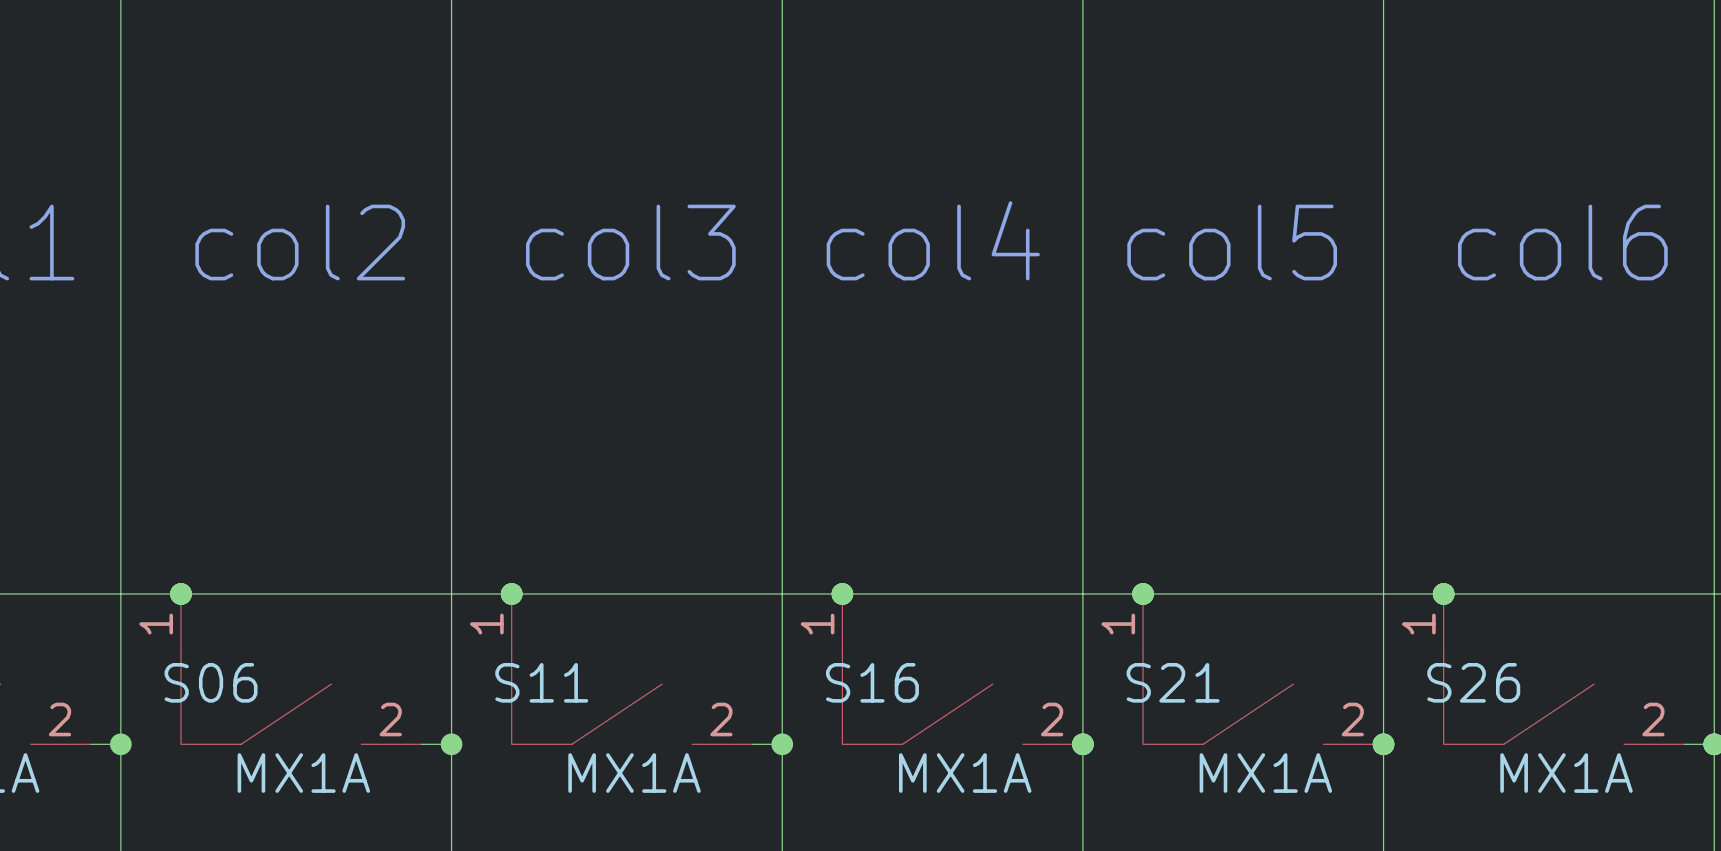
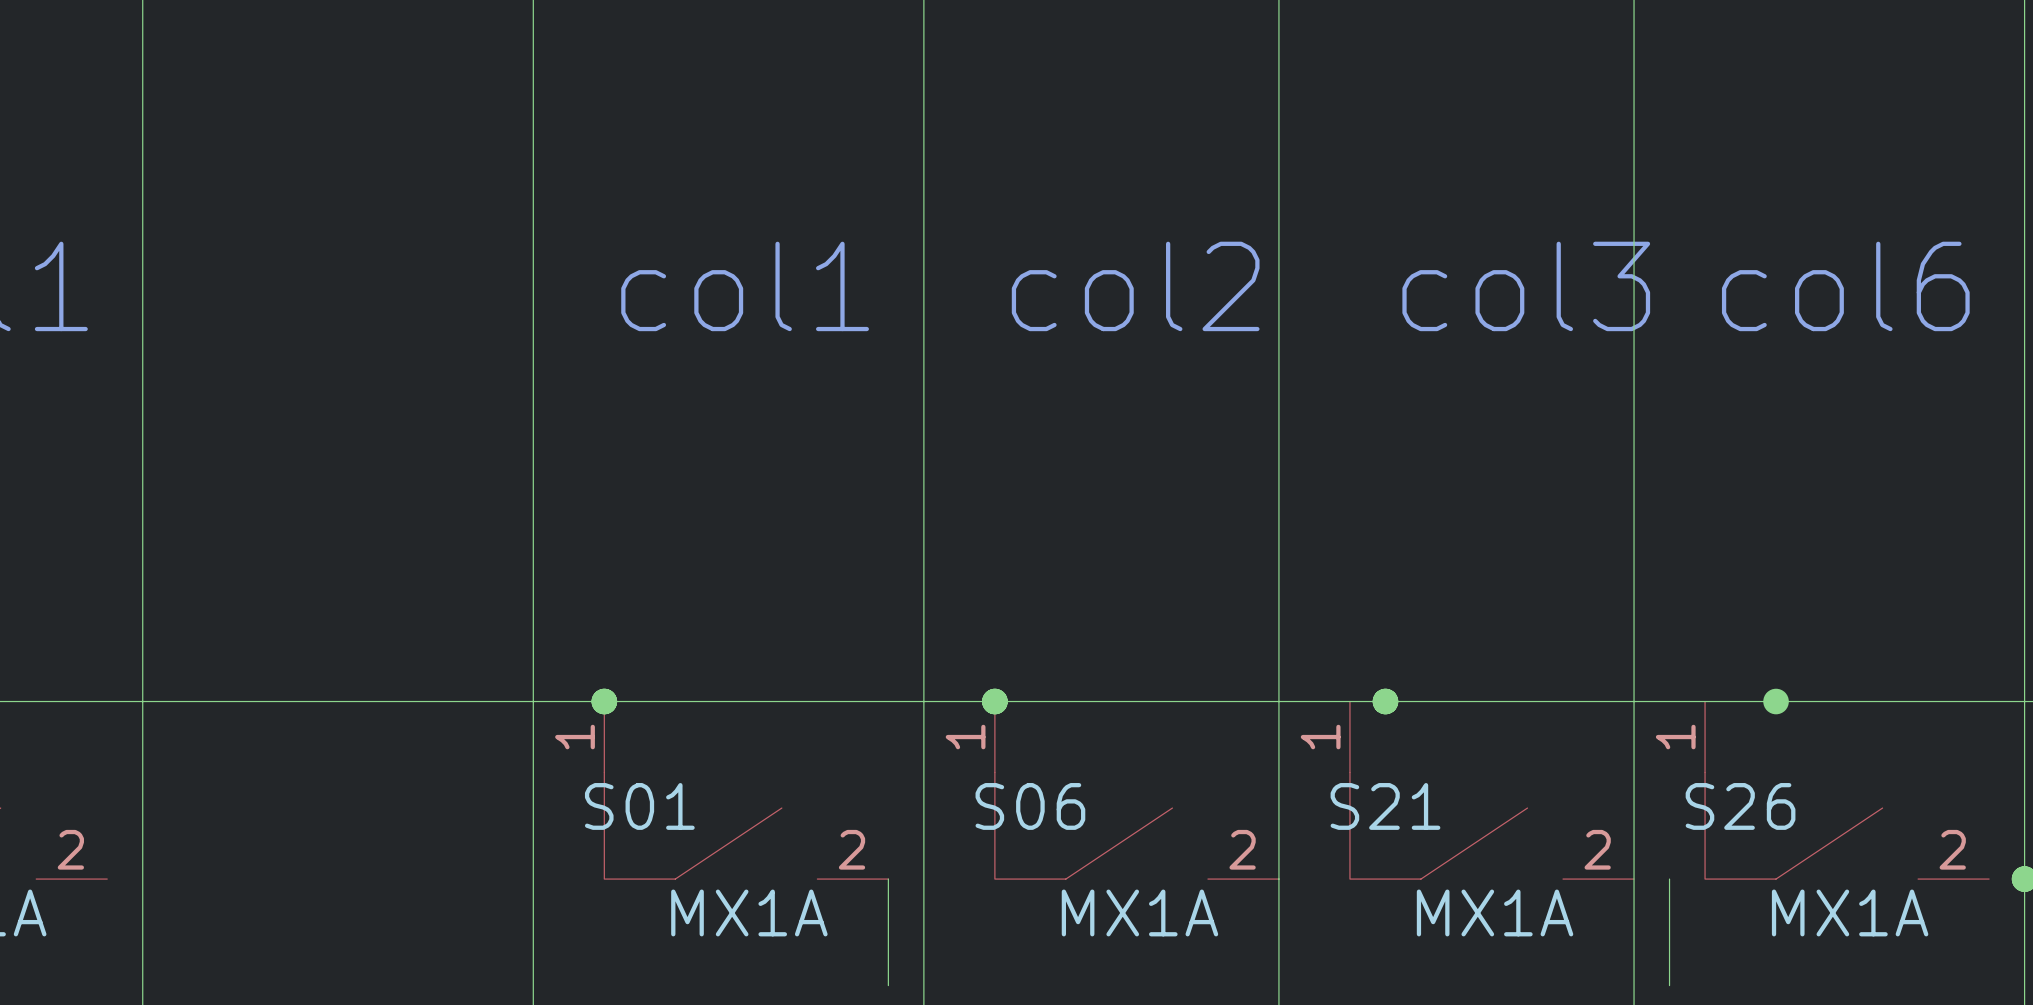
text: col4 (933, 240) -> col2 (1135, 286)
text: col2 (300, 242) -> none
text: col3 (630, 242) -> col1 (745, 286)
text: col5 (1232, 242) -> col3 (1526, 286)
junction: (180, 593) -> none
junction position: (1143, 593) -> (1385, 701)
junction position: (1443, 593) -> (1776, 701)
S06: MX1A (301, 669) -> none
S11 name: S11 (541, 682) -> S01 (639, 806)
S16 name: S16 (872, 682) -> S06 (1030, 806)
wire: (90, 744) (120, 744) -> none
junction: (120, 744) -> none
wire: (421, 744) (451, 744) -> none
junction: (451, 744) -> none
wire: (752, 744) (782, 744) -> (888, 879) (888, 985)
junction: (782, 744) -> none
junction: (1082, 744) -> none
junction: (1383, 744) -> none
wire: none -> (1669, 879) (1669, 985)
wire: (1684, 744) (1714, 744) -> none

